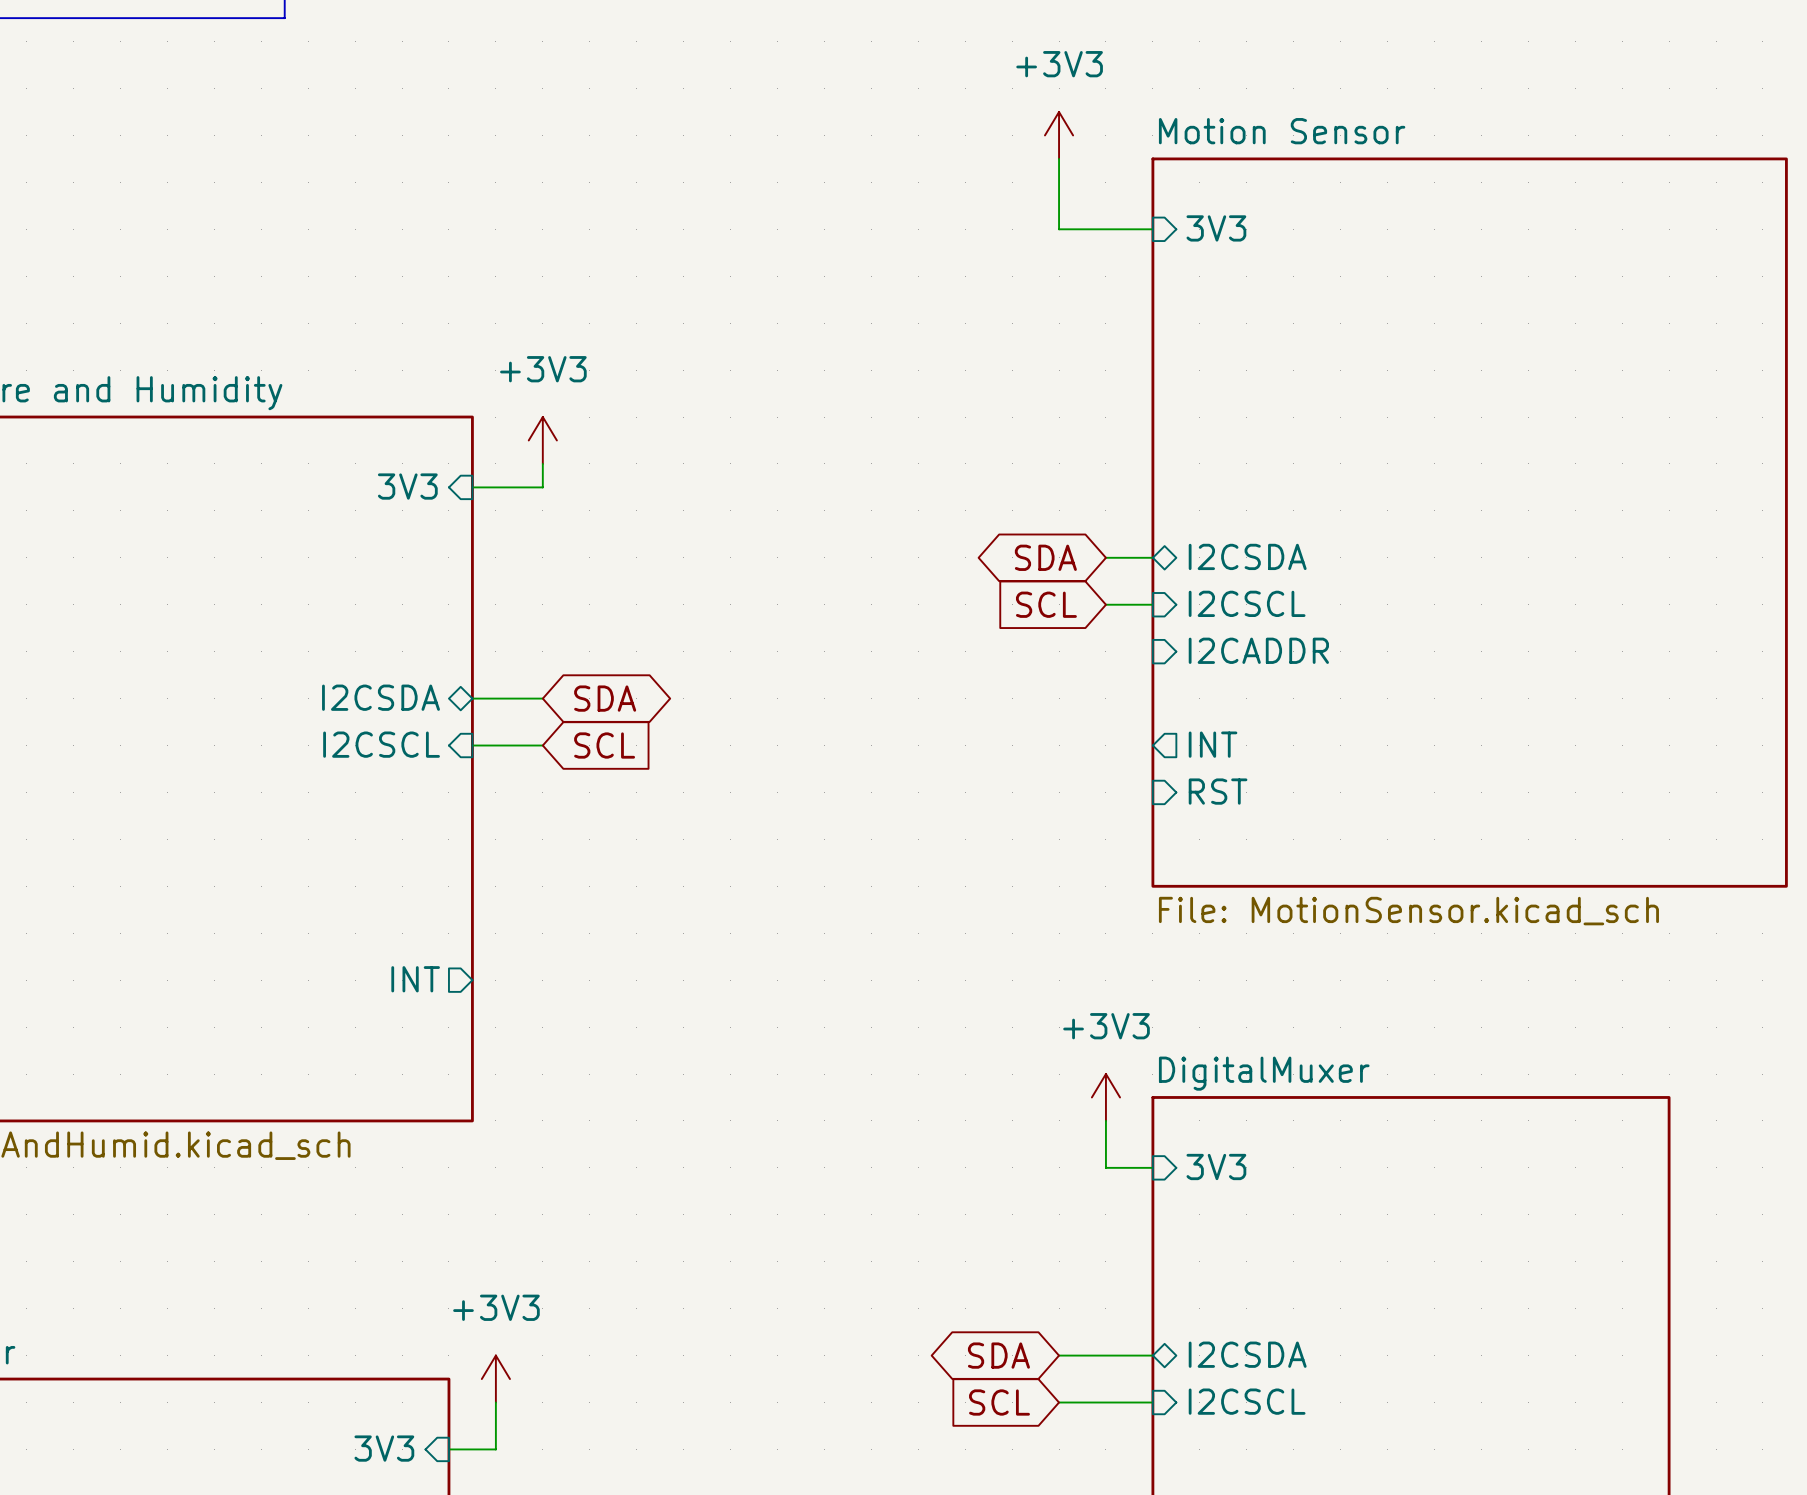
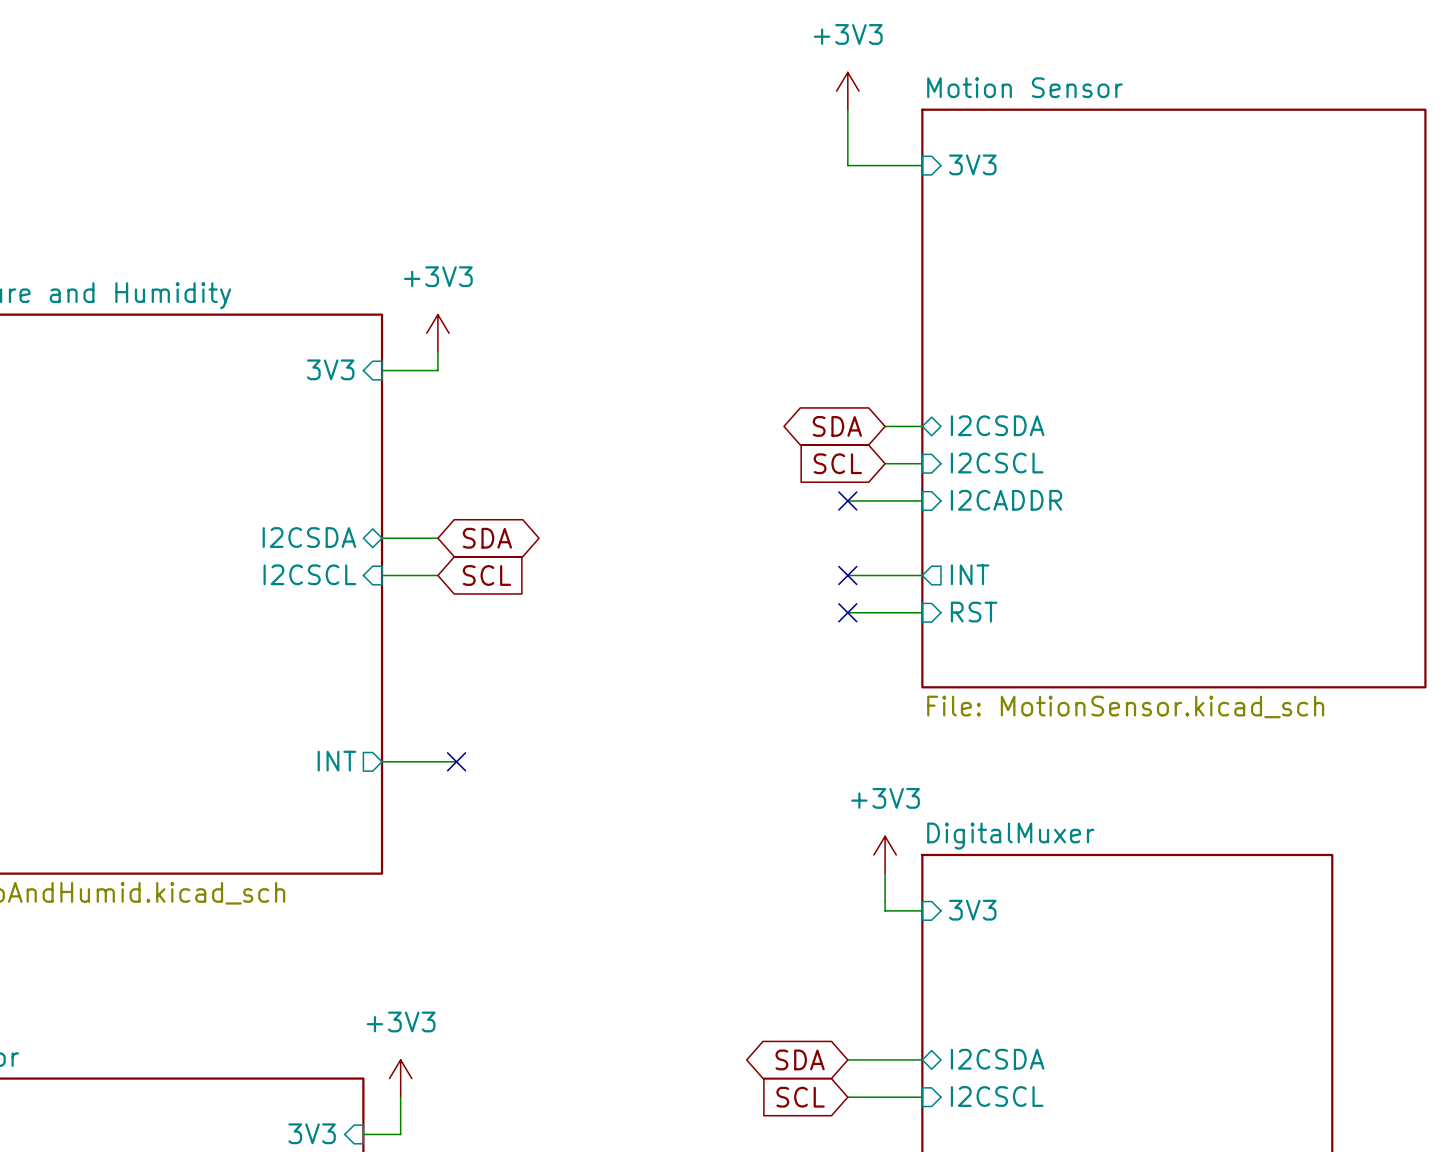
wire: none -> (847, 500) (922, 500)
no-connect mark: none -> (847, 500)
wire: none -> (847, 575) (922, 575)
no-connect mark: none -> (847, 575)
wire: none -> (847, 612) (922, 612)
no-connect mark: none -> (847, 612)
wire: none -> (382, 761) (456, 761)
no-connect mark: none -> (456, 761)

